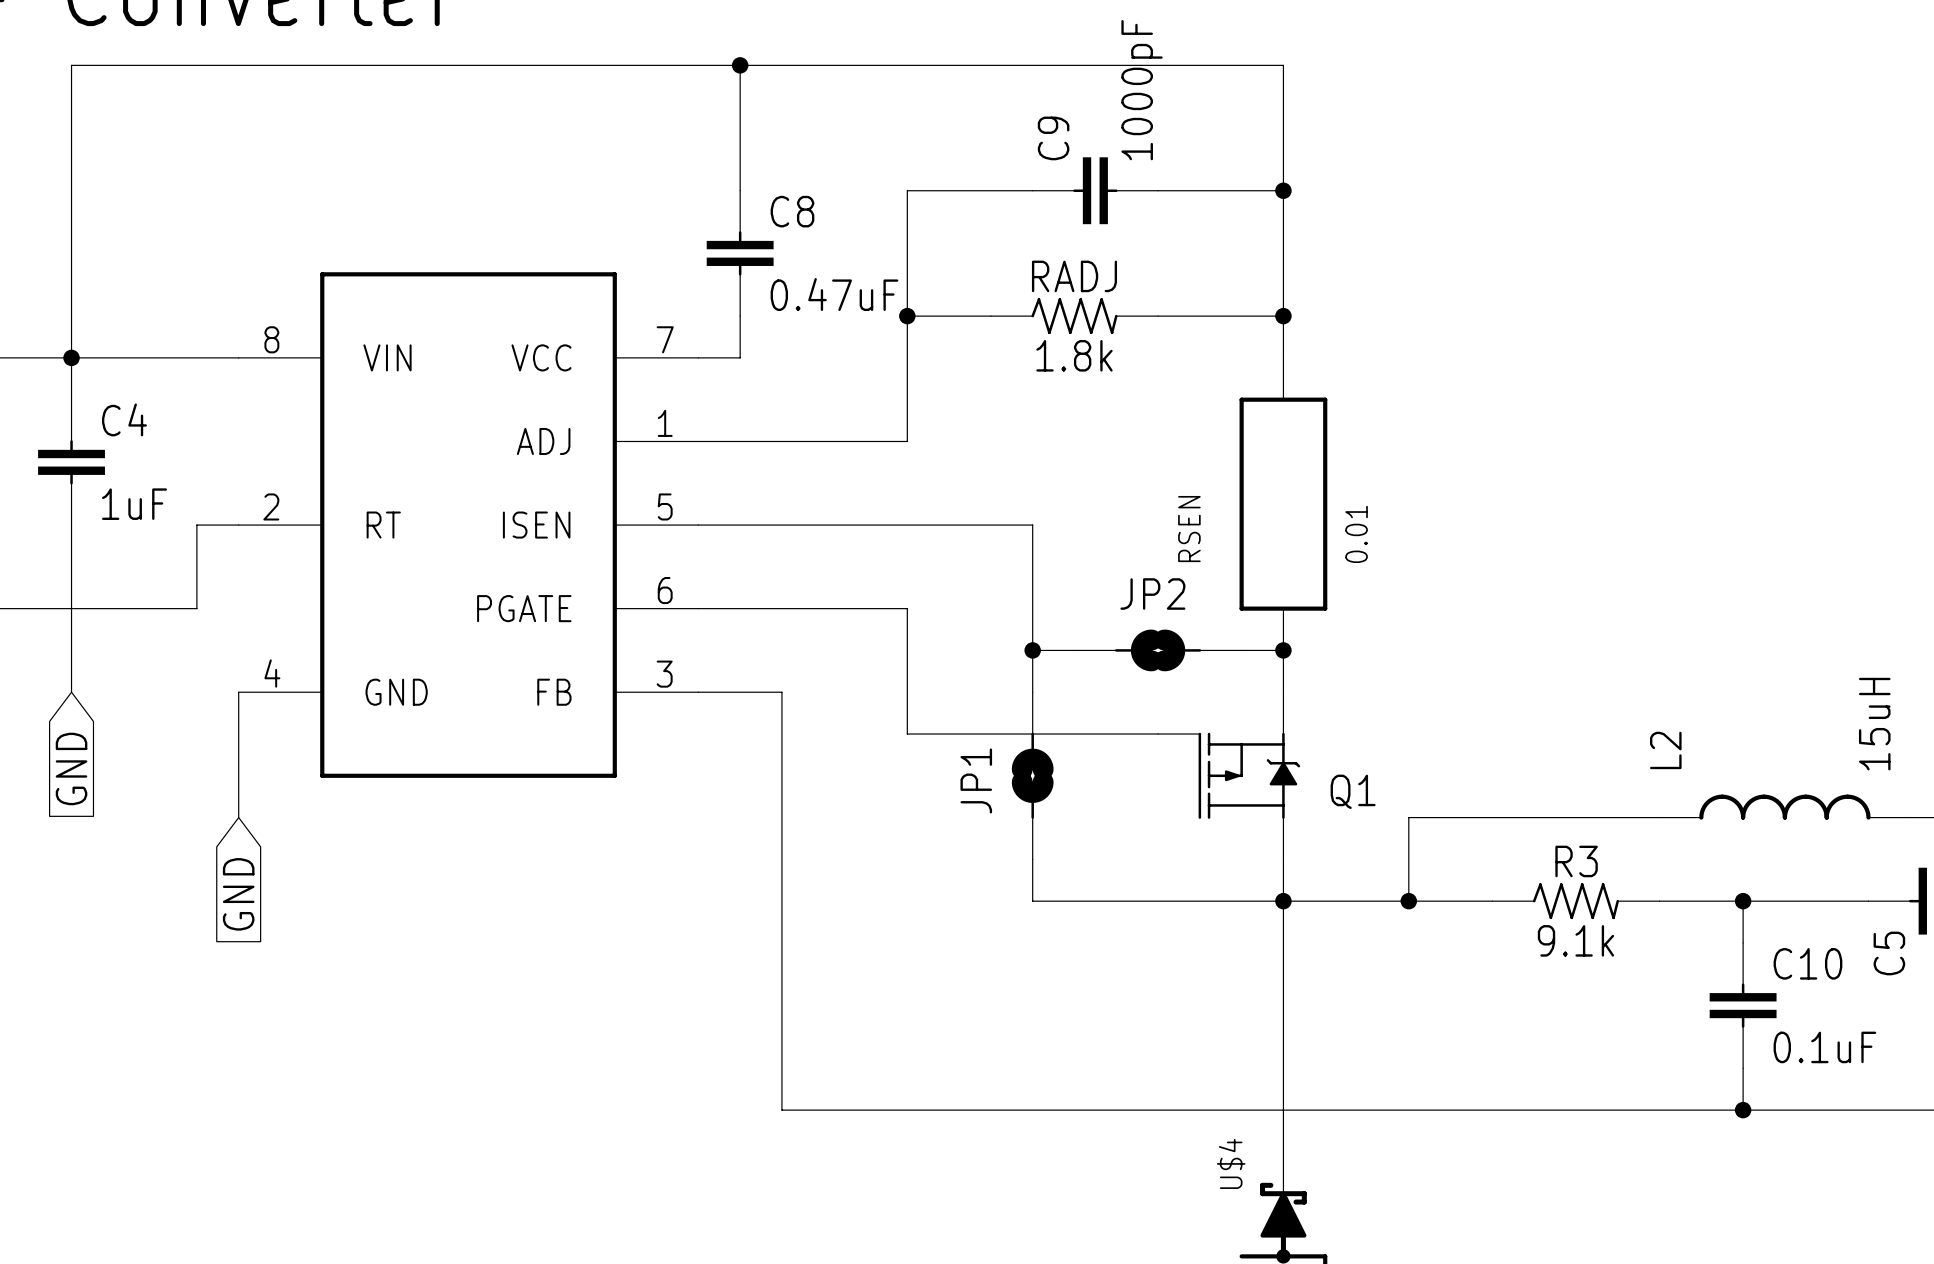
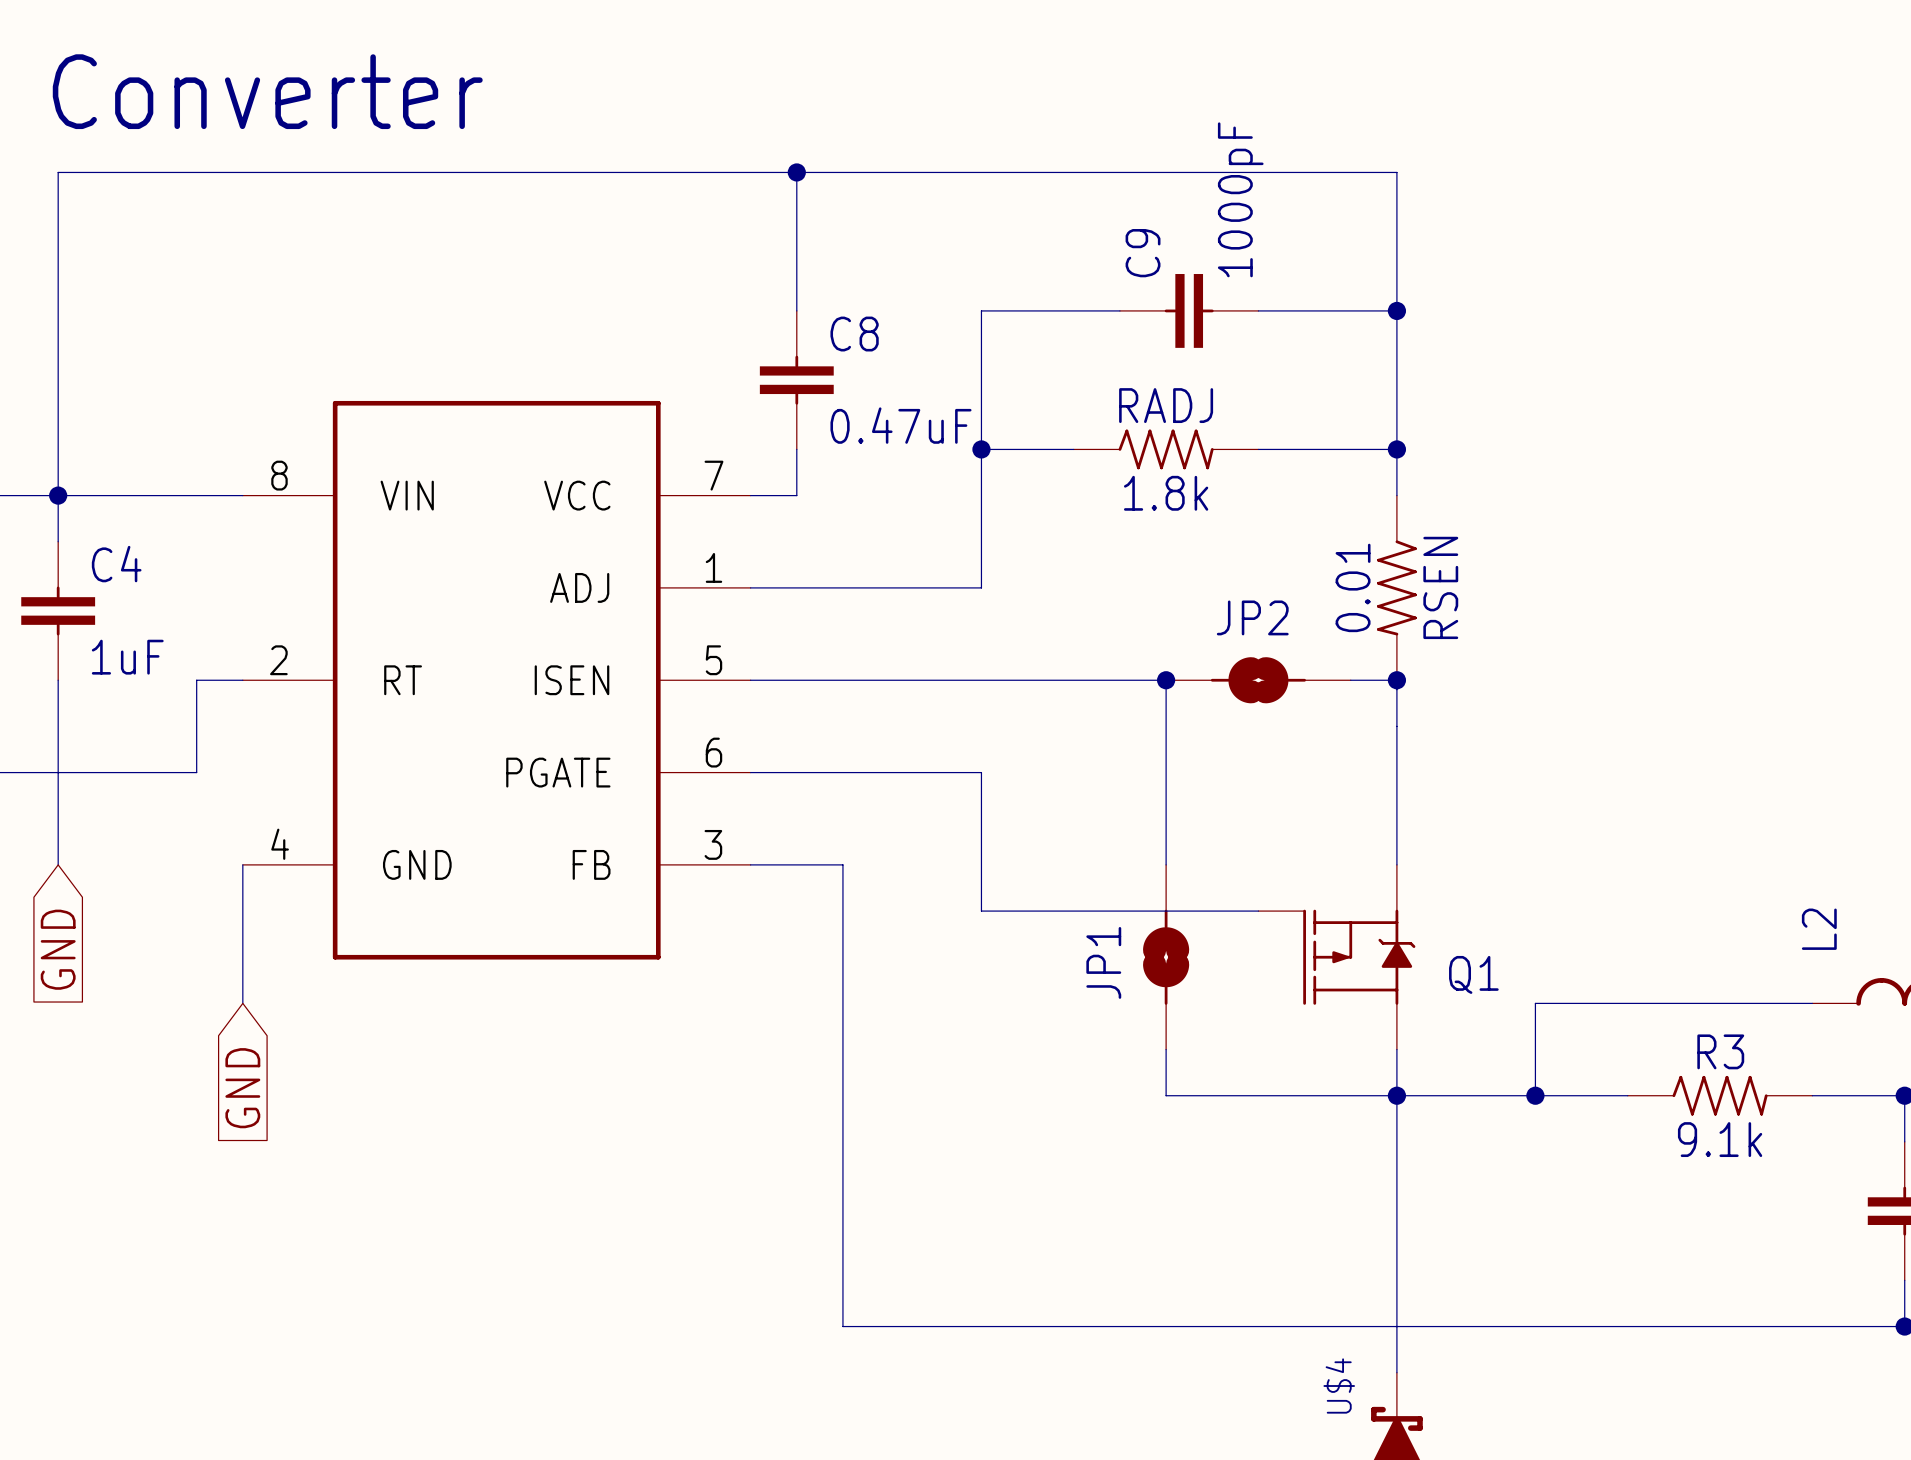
RSEN: none -> 0.01 (1396, 587)
RSEN: 0.01 (1283, 504) -> none
wire: (1032, 525) (1032, 692) -> (1119, 680) (1166, 680) (1166, 864)
junction: none -> (1166, 680)
junction: none -> (1396, 680)
wire: (1032, 650) (1074, 650) -> none
junction: (1032, 650) -> none
JP2 position: (1158, 650) -> (1258, 680)
wire: (1241, 650) (1283, 650) -> (1350, 680) (1396, 680) (1396, 818)
junction: (1283, 650) -> none
JP1 position: (1032, 775) -> (1166, 957)
wire: (1032, 859) (1032, 901) (1074, 901) -> (1166, 1049) (1166, 1095)

